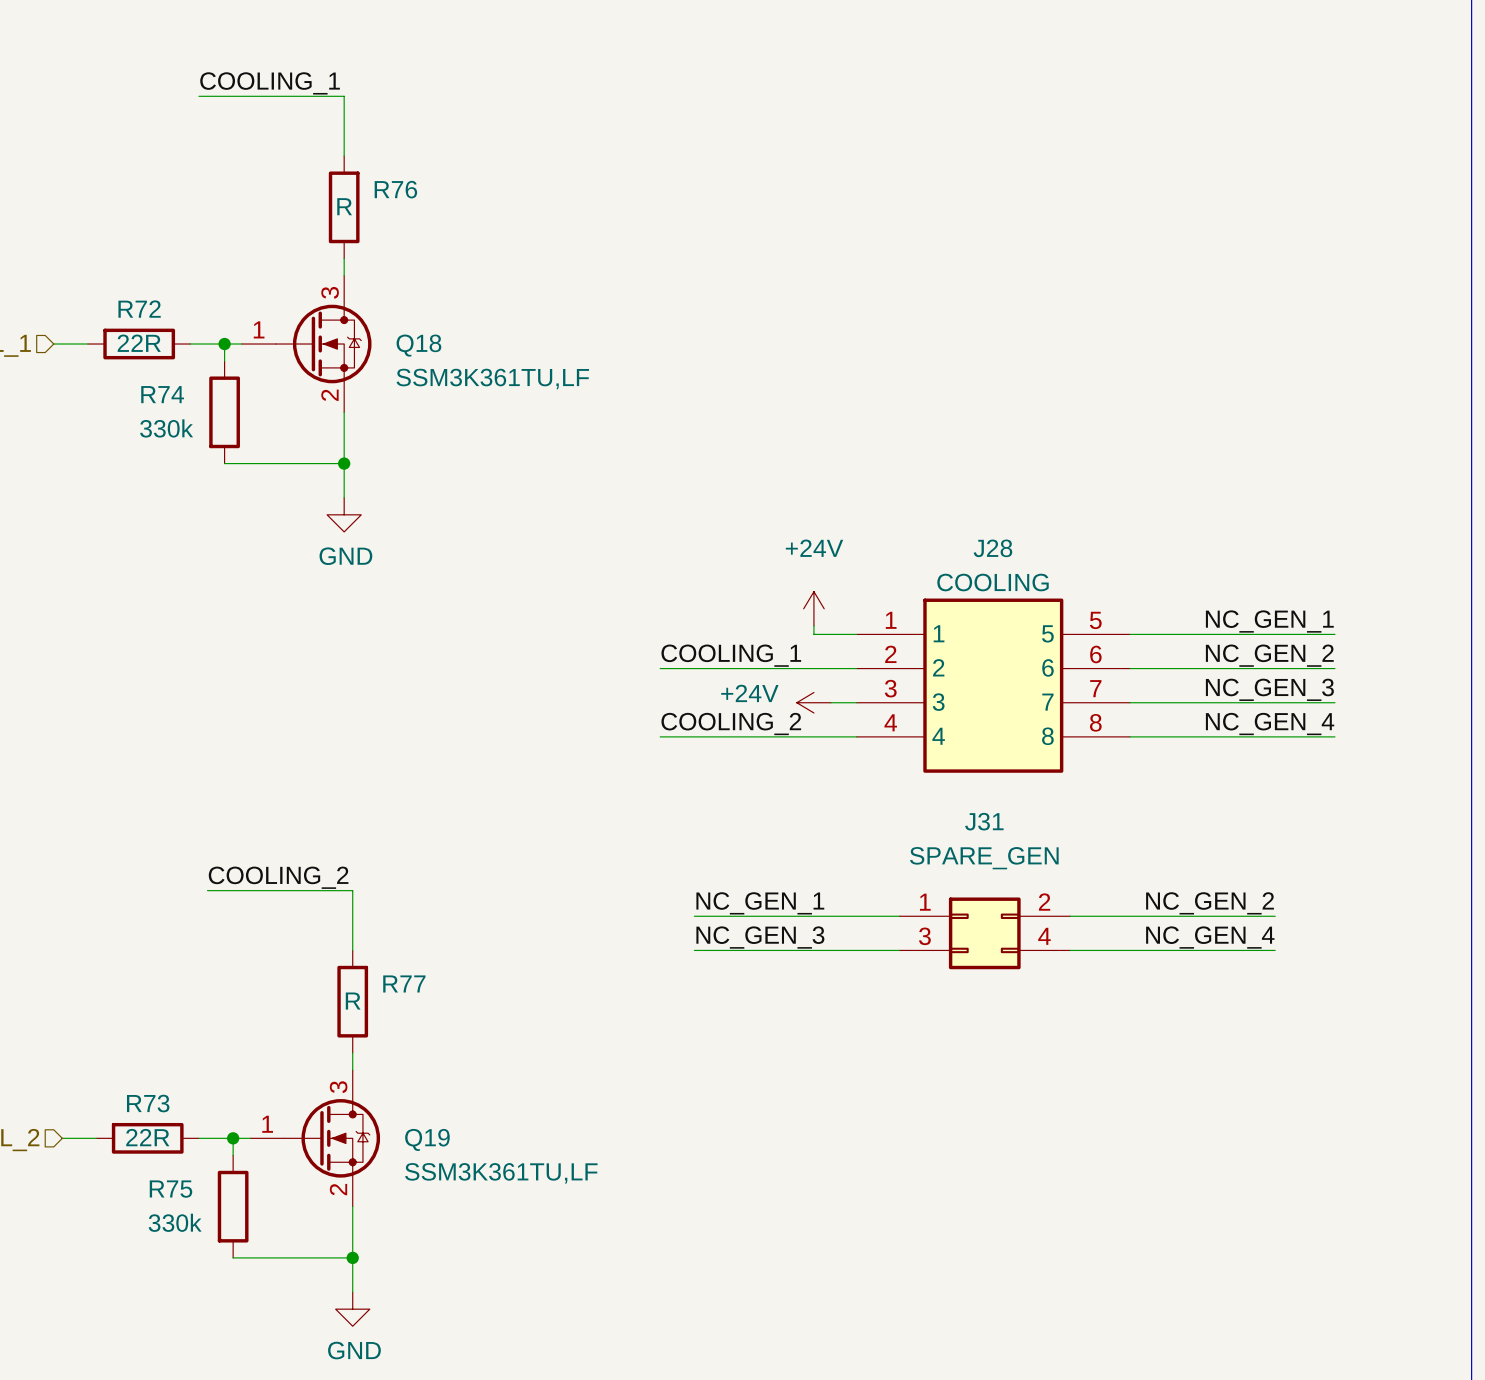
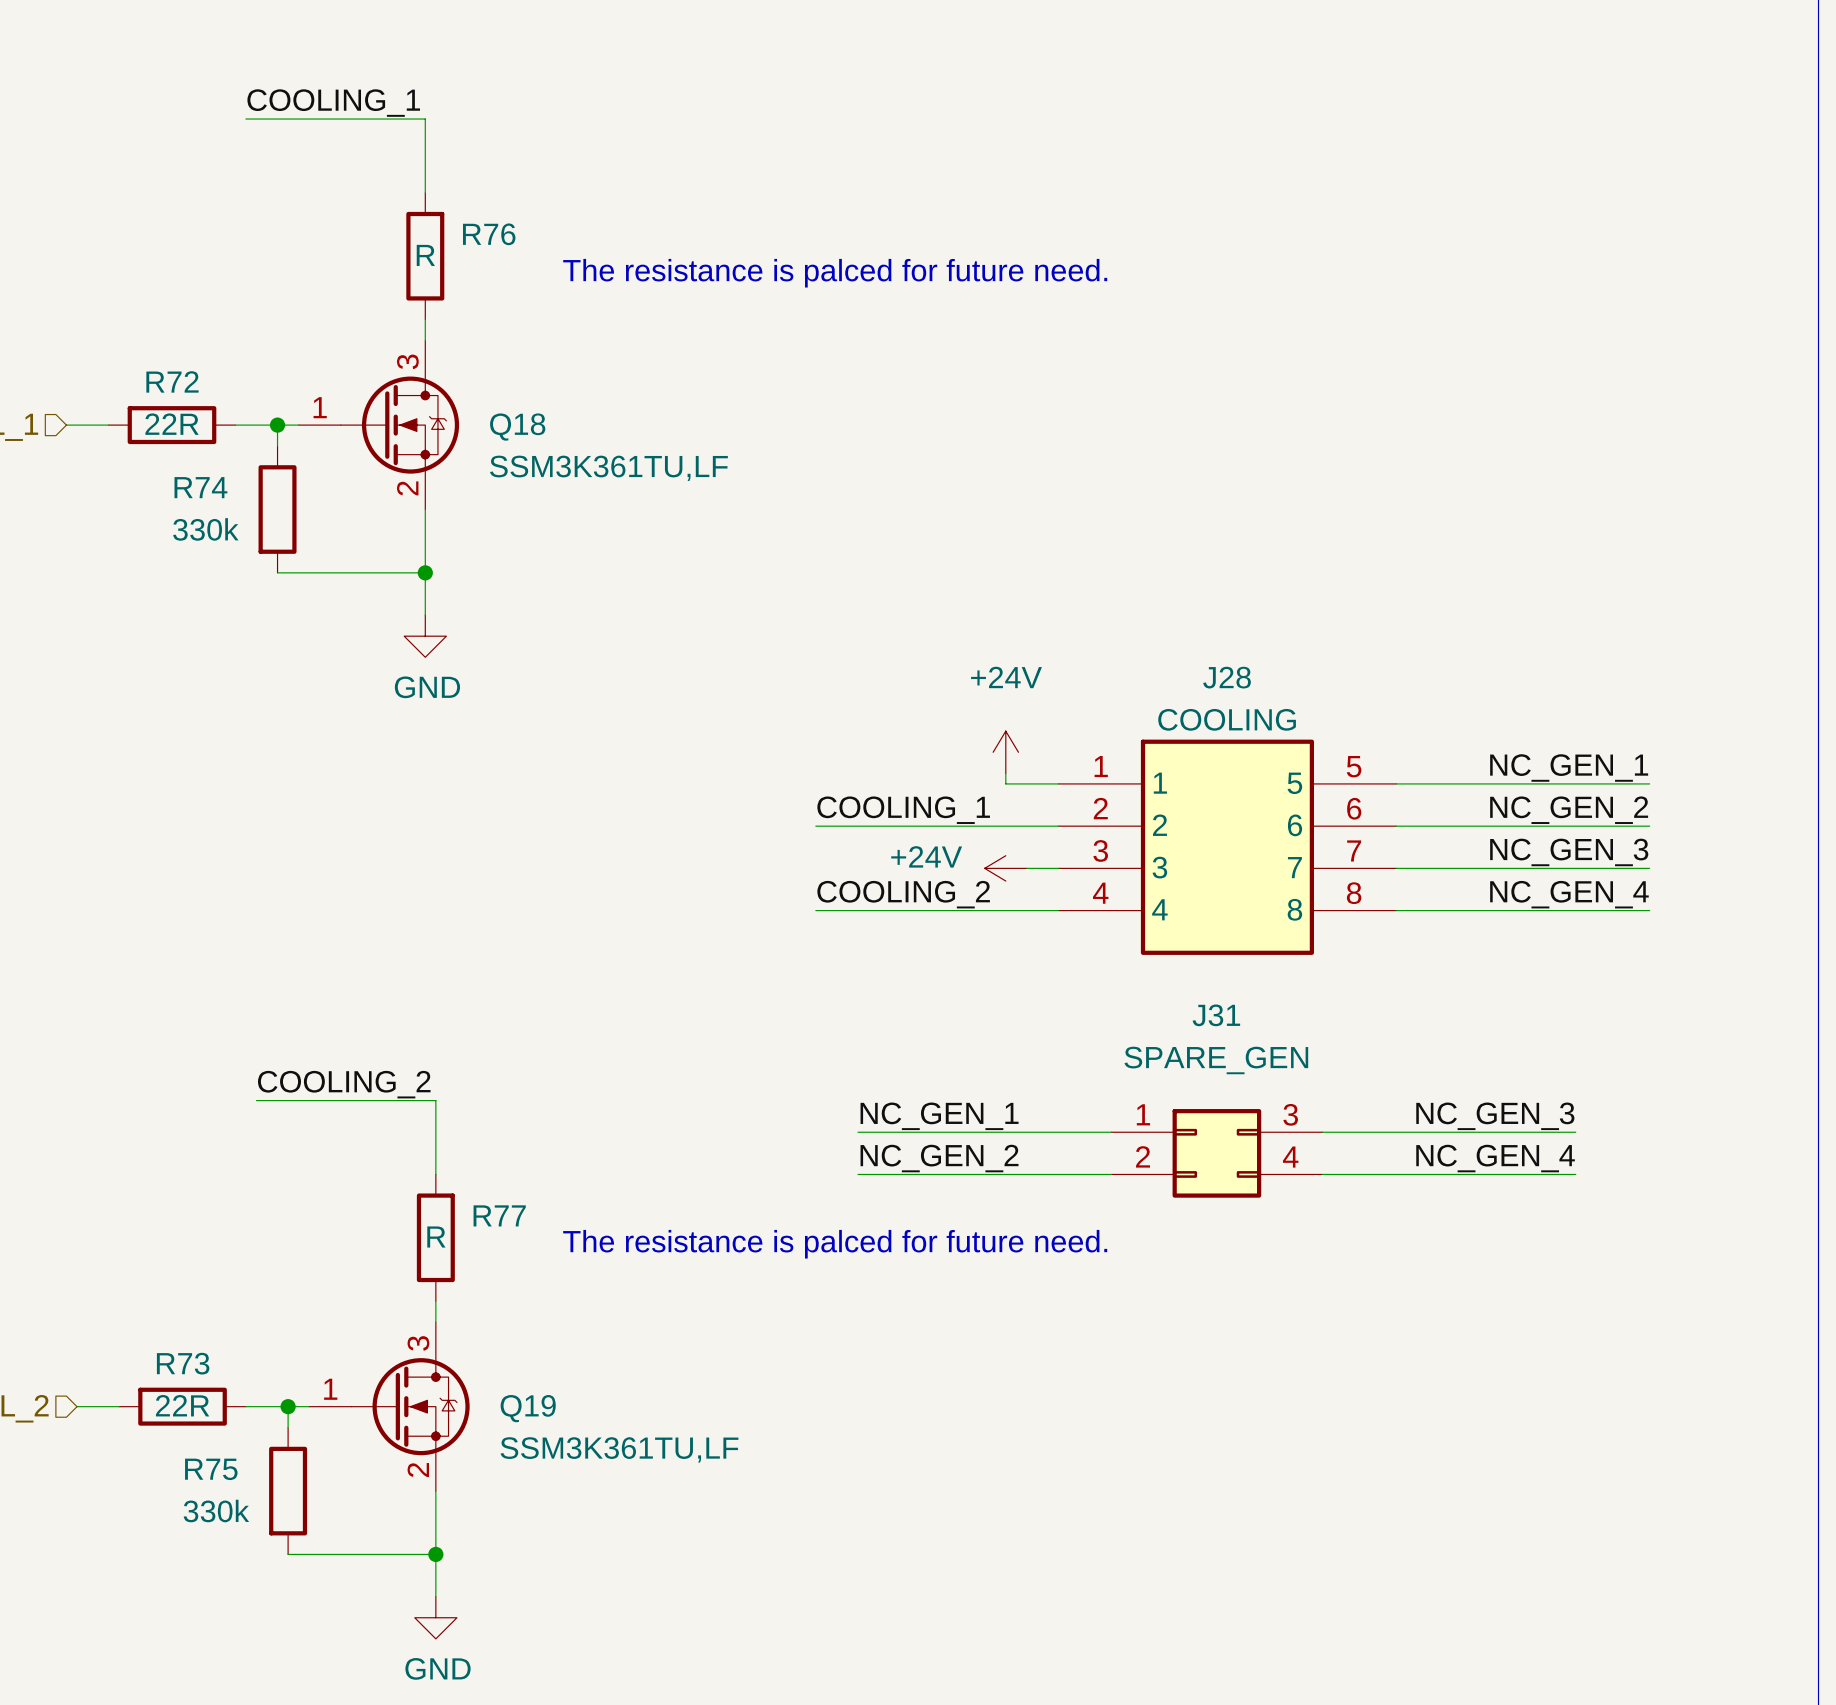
text: none -> The resistance is palced for future need. (835, 273)
J31 pin number: 2 (1044, 902) -> 3 (1290, 1114)
label: NC_GEN_2 (1210, 903) -> NC_GEN_3 (1495, 1116)
J31 pin number: 3 (924, 936) -> 2 (1143, 1156)
label: NC_GEN_3 (760, 937) -> NC_GEN_2 (939, 1158)
text: none -> The resistance is palced for future need. (835, 1244)

